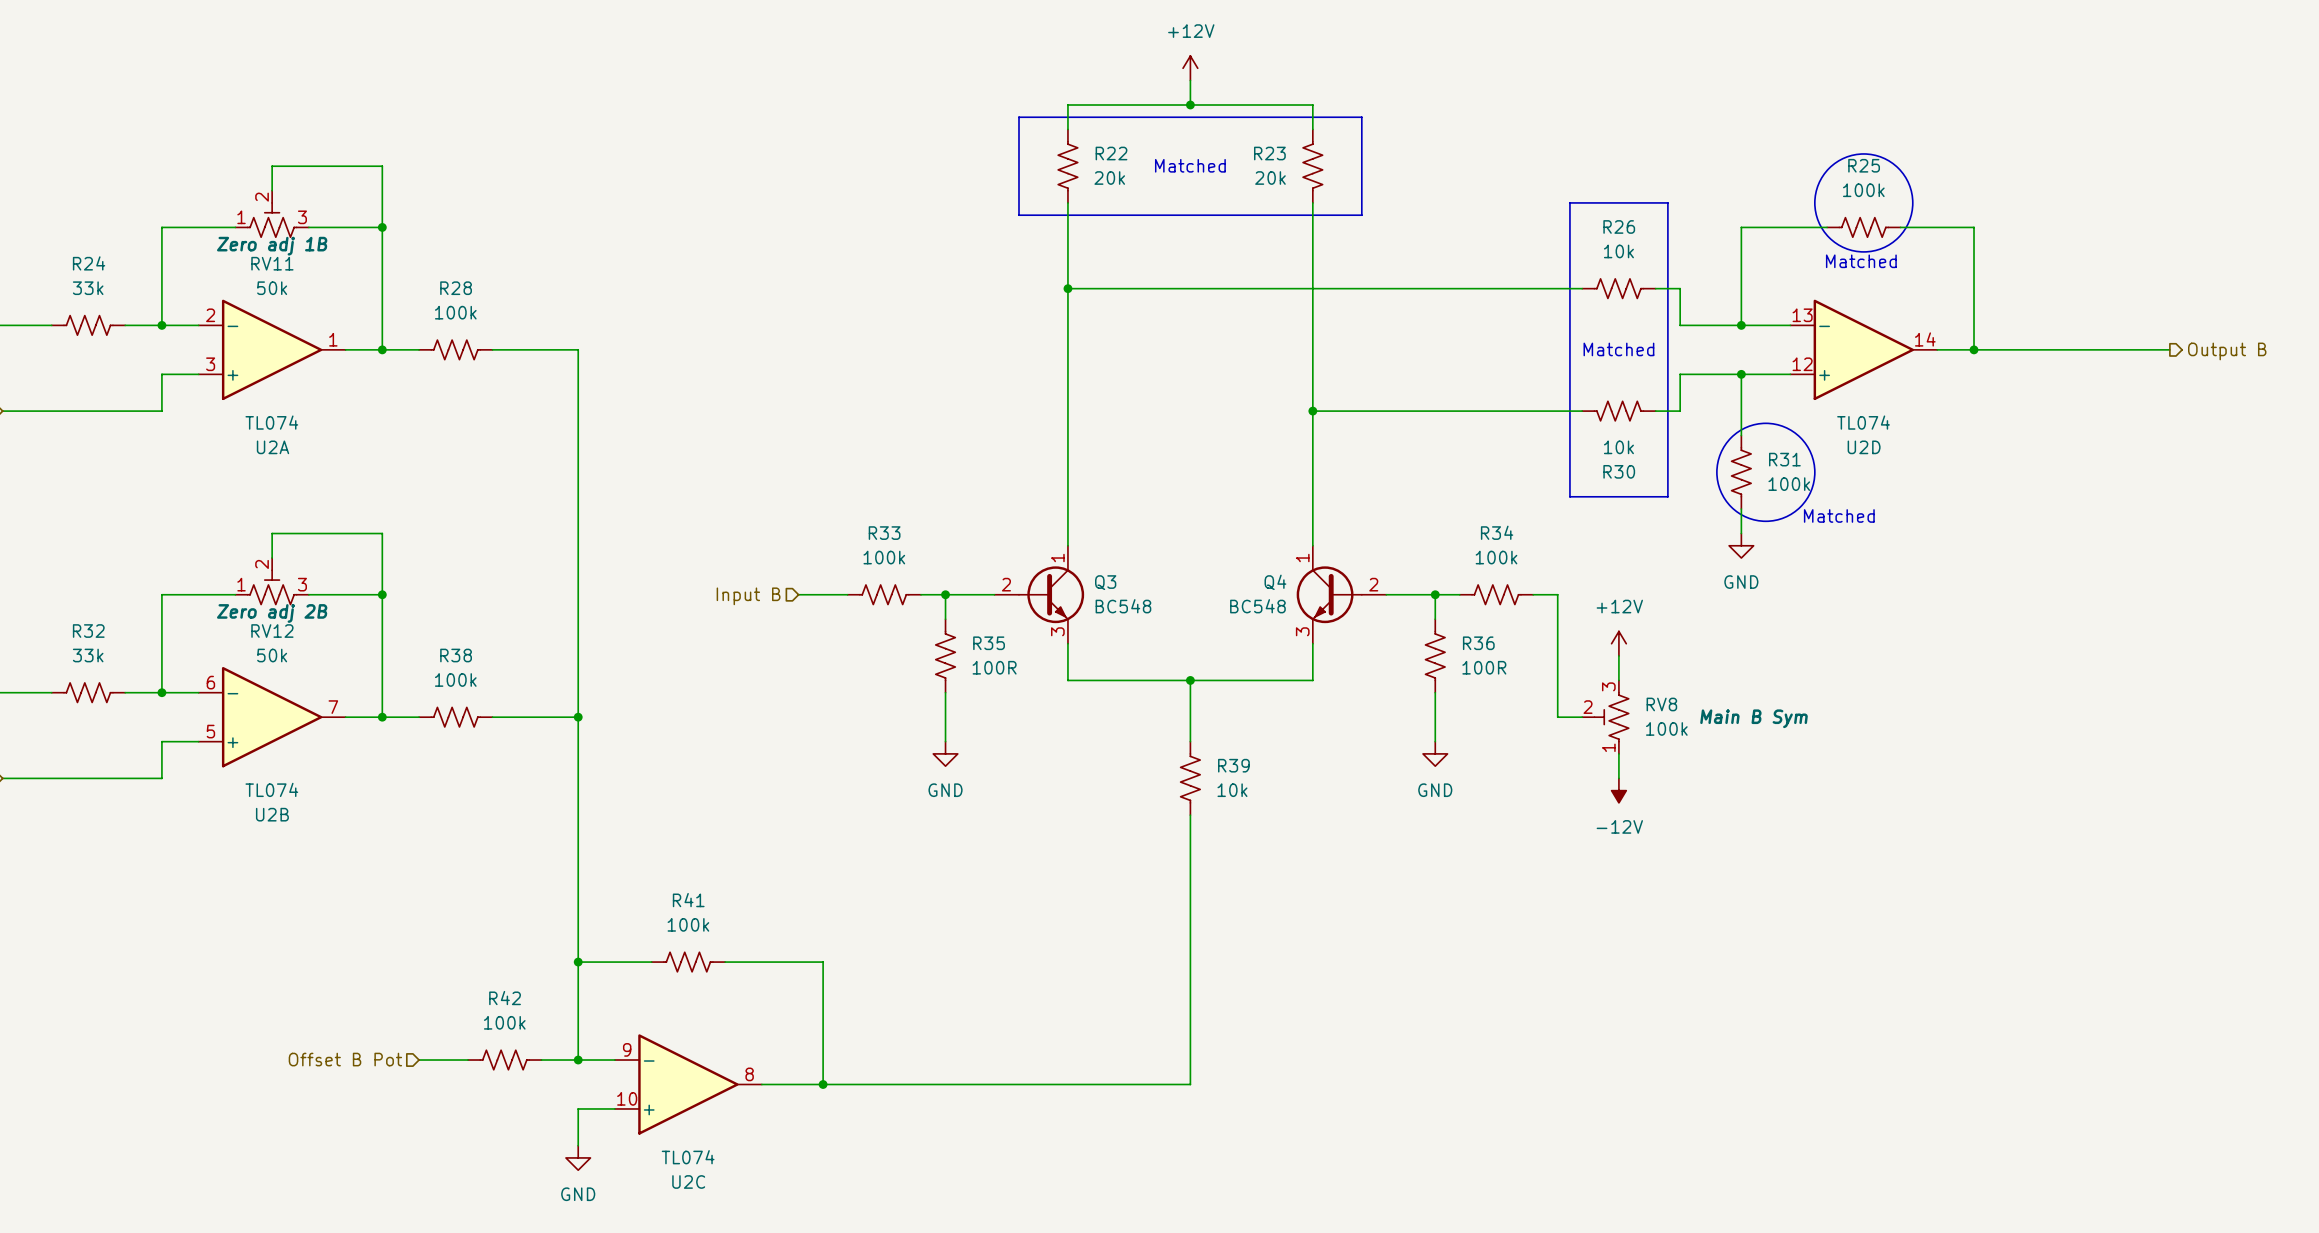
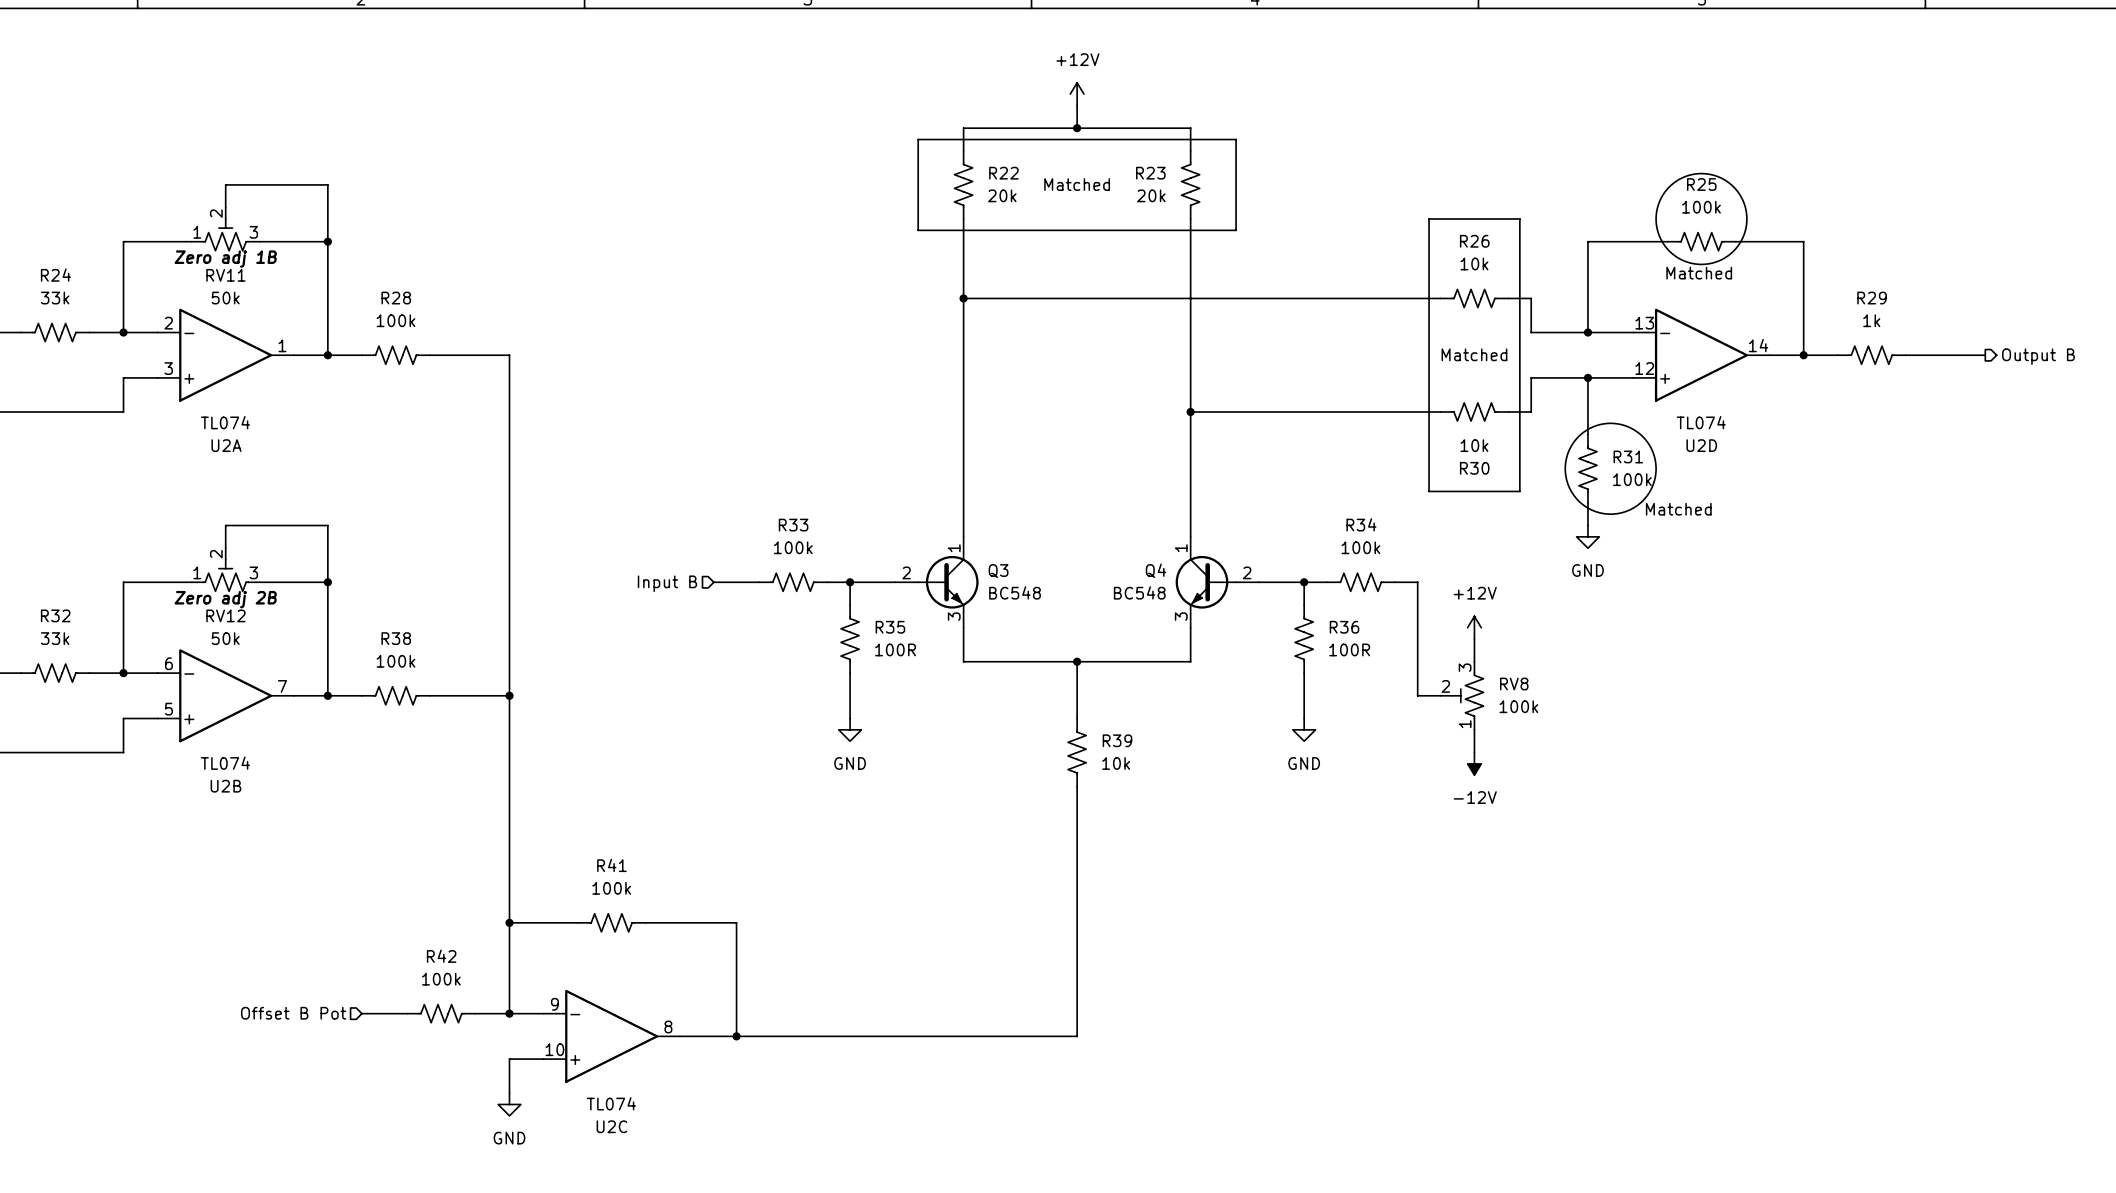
R29: none -> 1k (1871, 355)
RV8 text: Main B Sym (1754, 718) -> none

